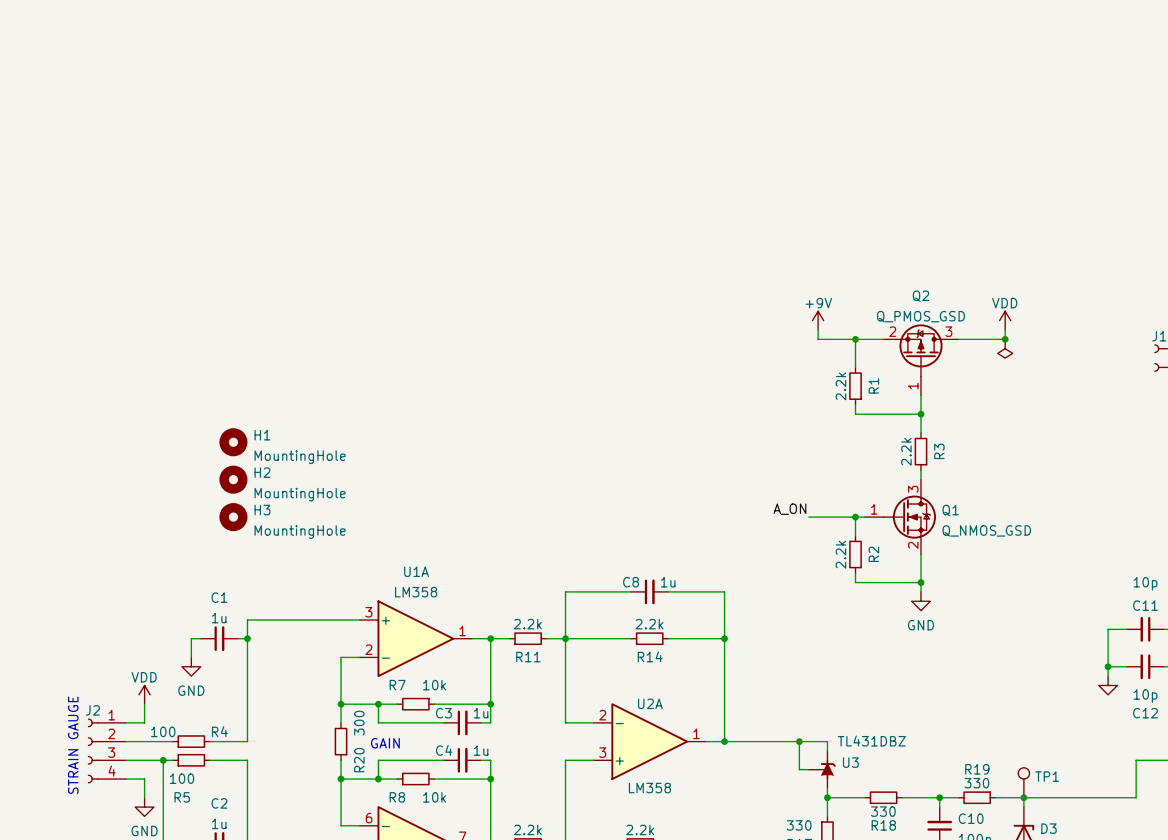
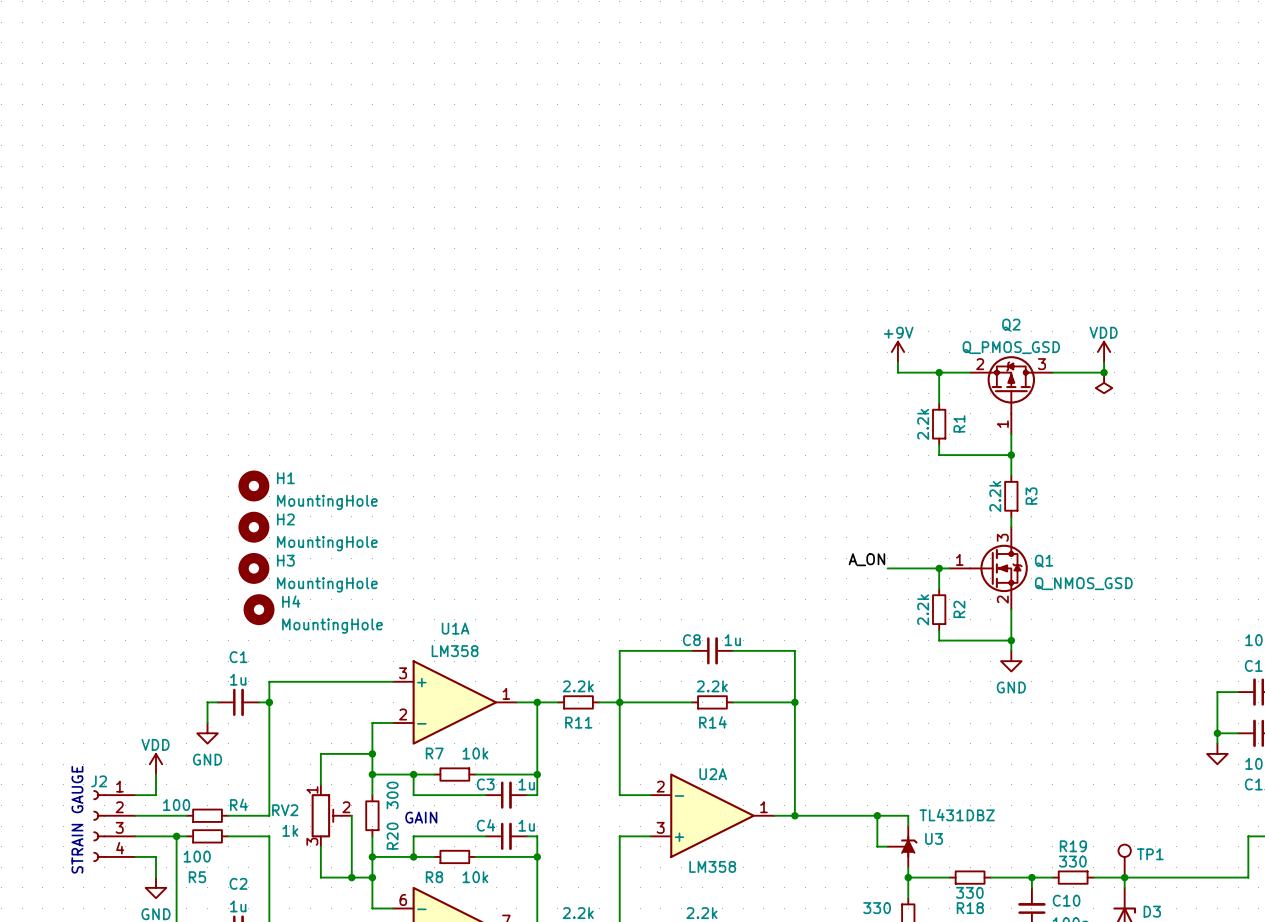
H4: none -> MountingHole (259, 609)
wire: none -> (372, 753) (320, 753) (320, 784)
junction: none -> (372, 753)
RV2: none -> 1k (331, 815)
wire: none -> (351, 815) (351, 877)
wire: none -> (320, 846) (320, 877) (372, 877)
junction: none -> (351, 877)
junction: none -> (372, 877)

